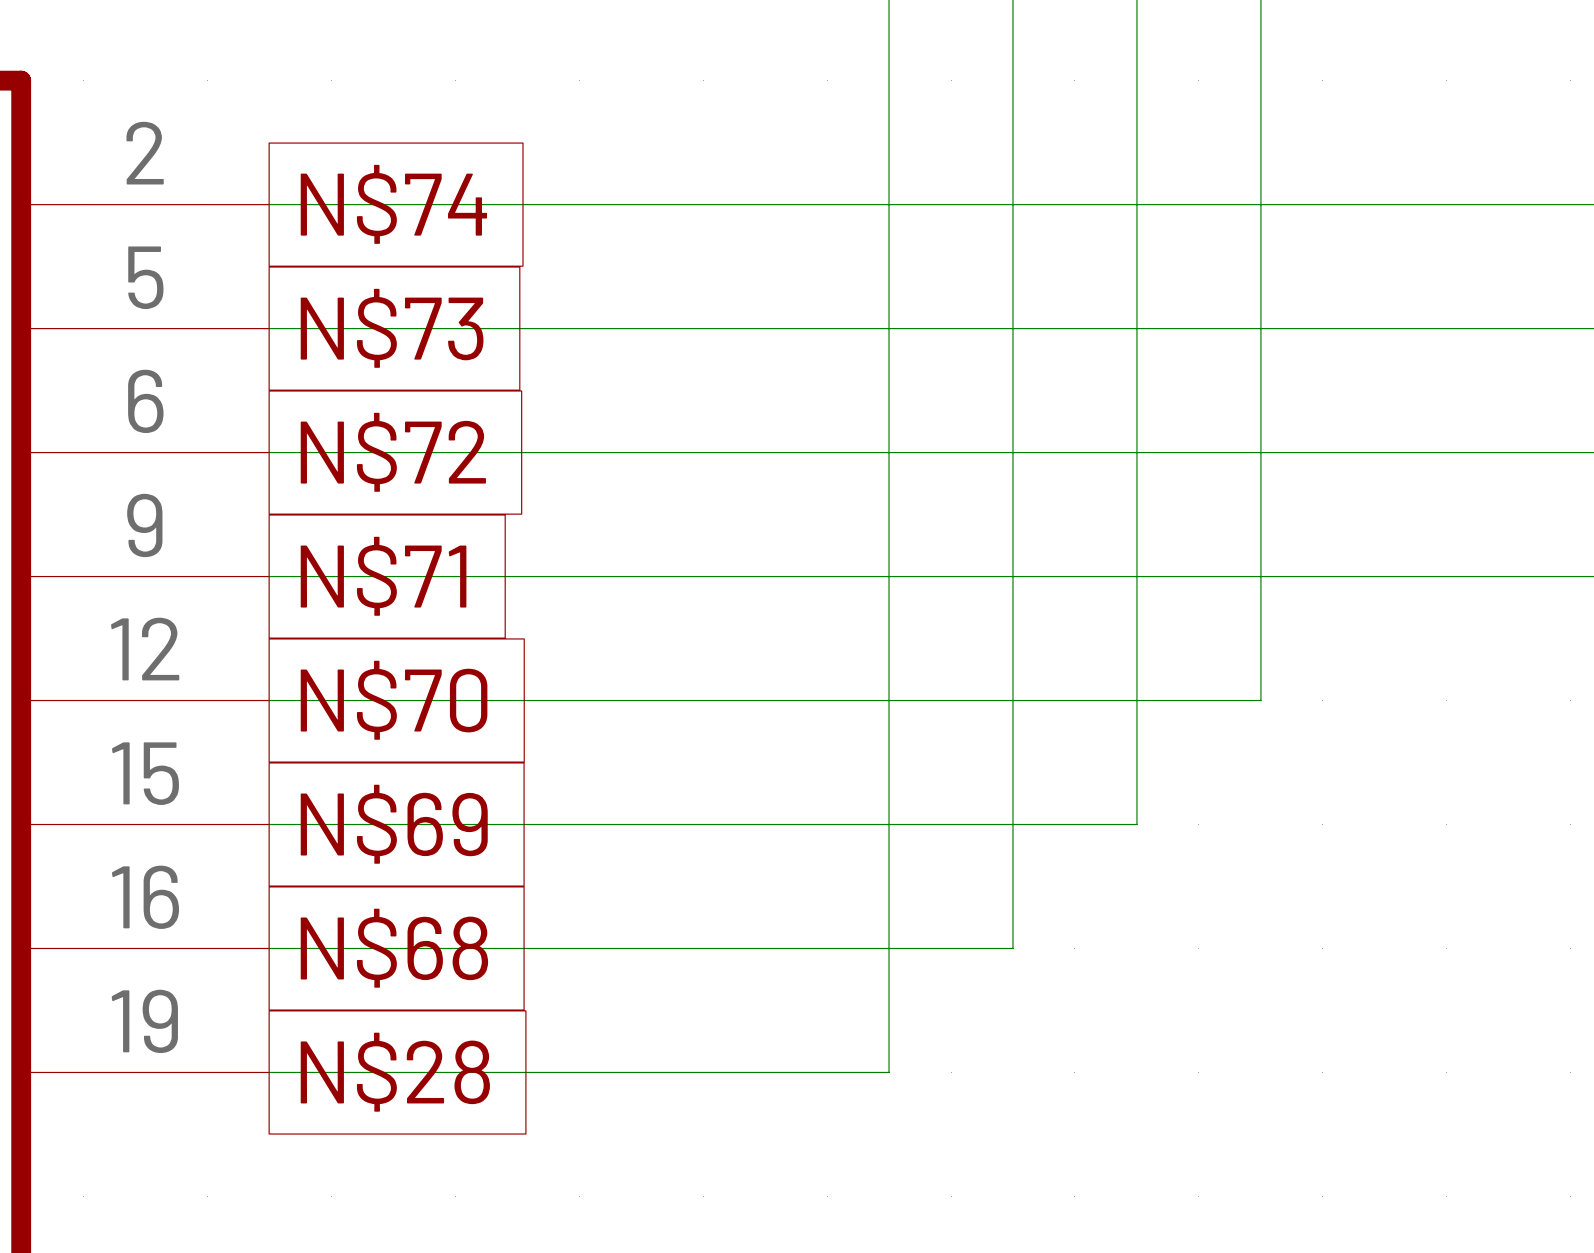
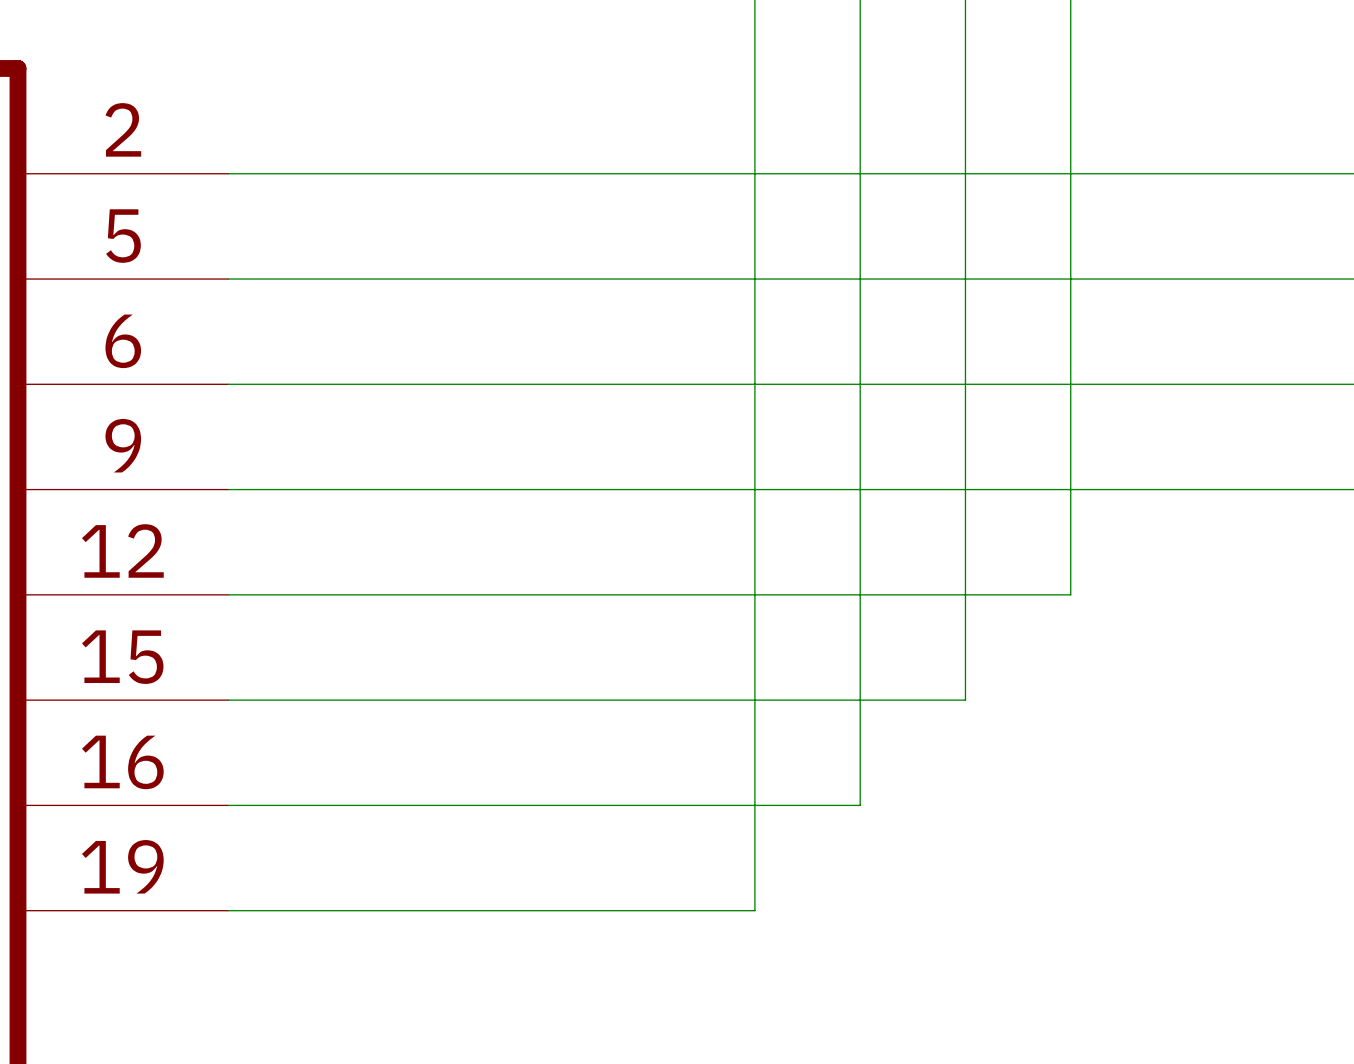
global label: N$74 (393, 204) -> none
global label: N$73 (392, 328) -> none
global label: N$72 (393, 452) -> none
global label: N$71 (383, 576) -> none
global label: N$70 (394, 700) -> none
global label: N$69 (394, 824) -> none
global label: N$68 (394, 948) -> none
global label: N$28 (395, 1072) -> none

